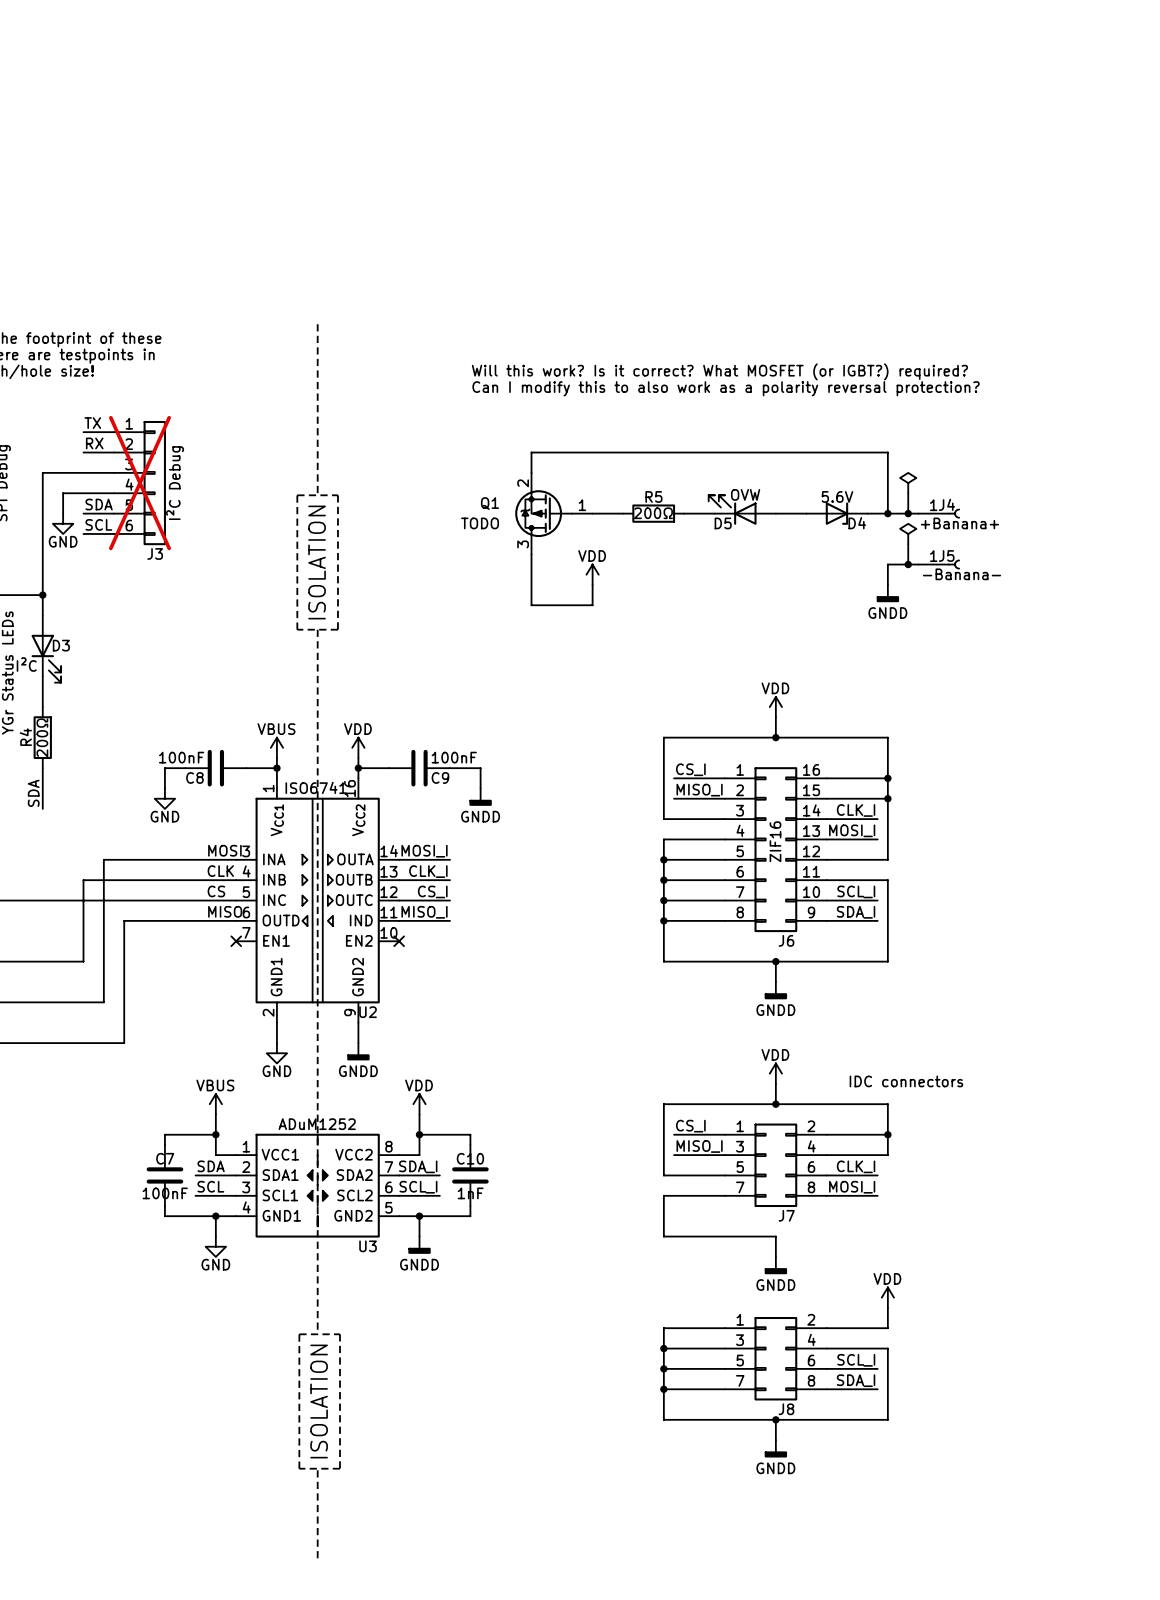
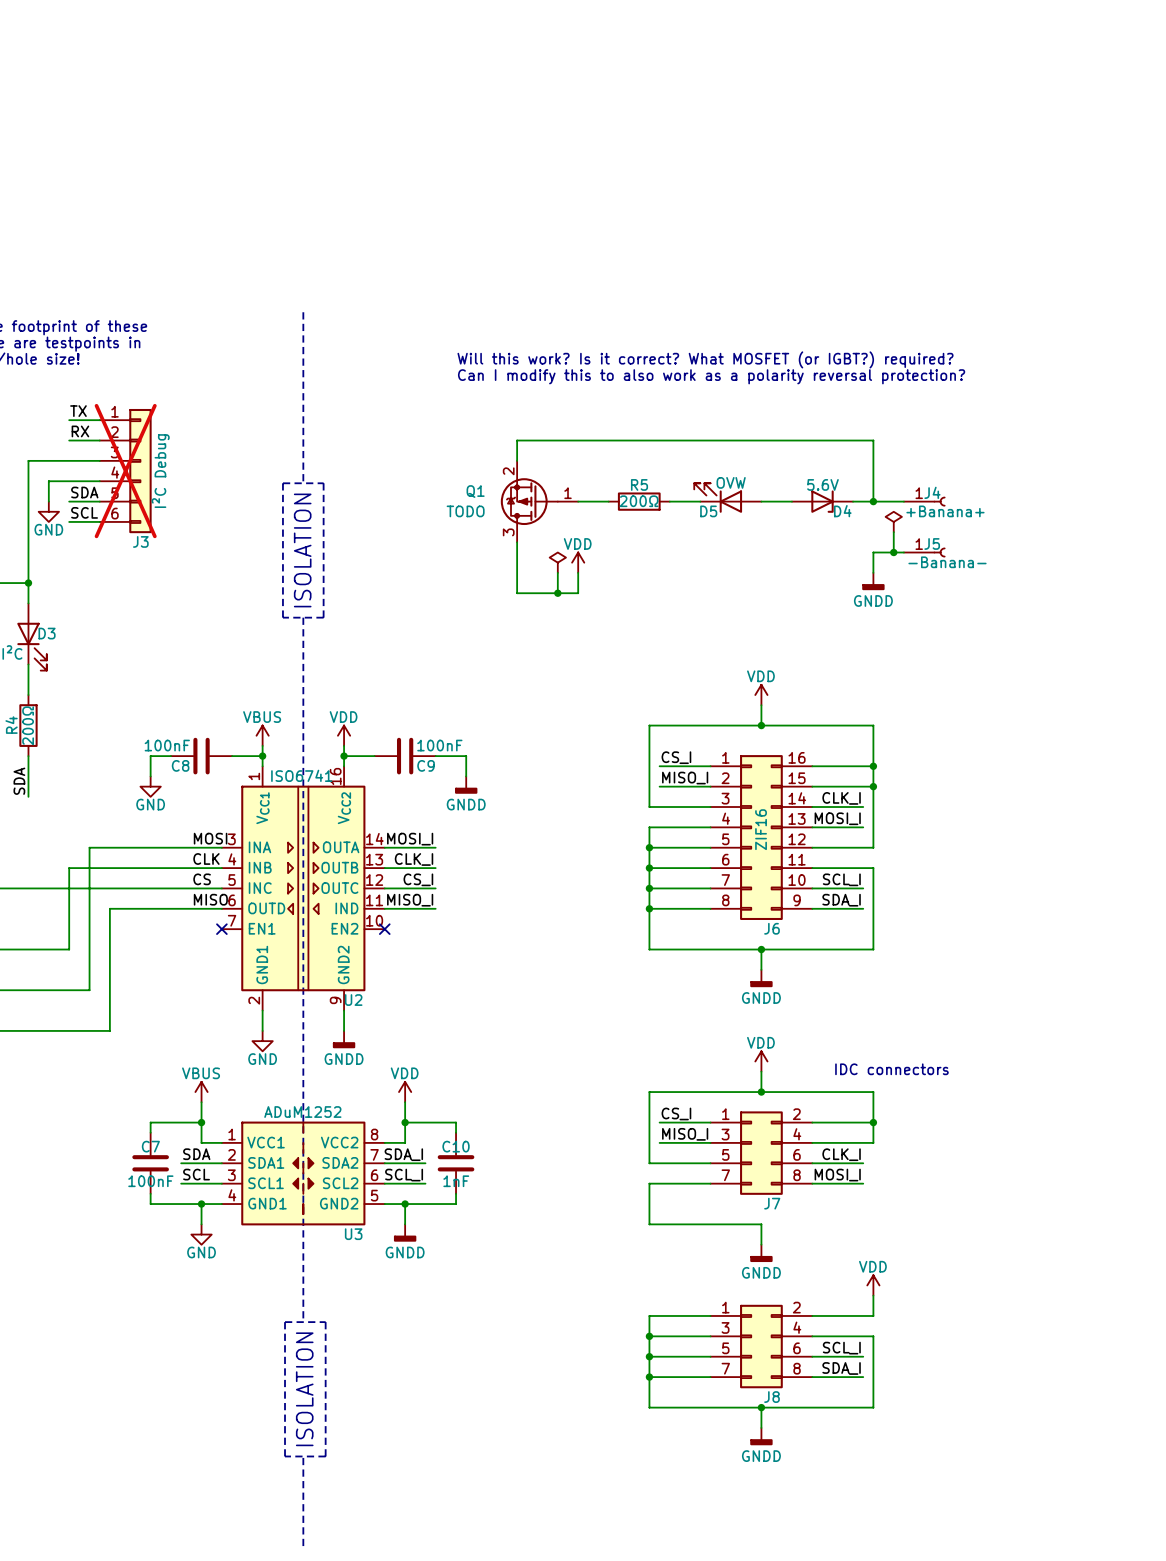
power symbol: (908, 483) -> none
wire: (908, 493) (908, 513) -> none
junction: (908, 513) -> none
power symbol: none -> (557, 562)
wire: none -> (557, 572) (557, 593)
junction: none -> (557, 593)

